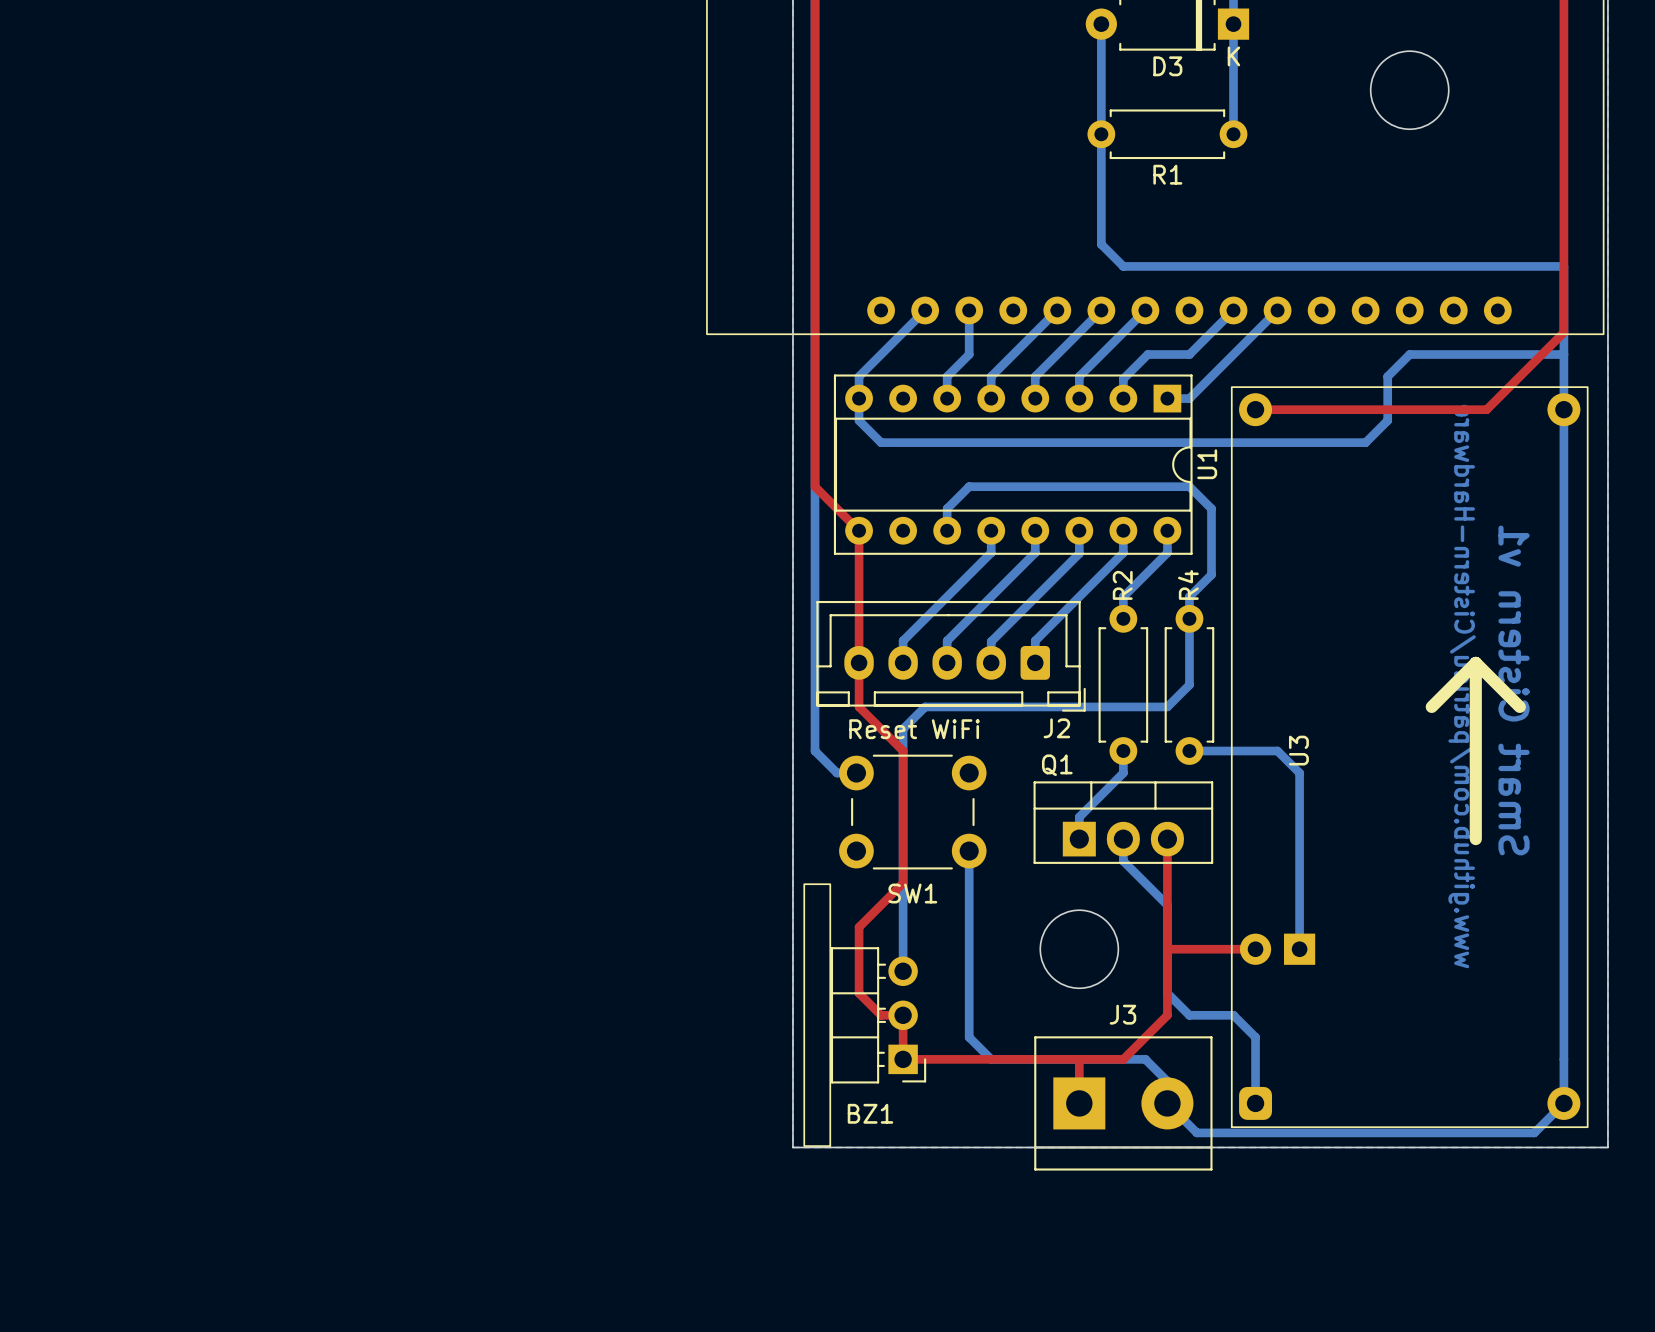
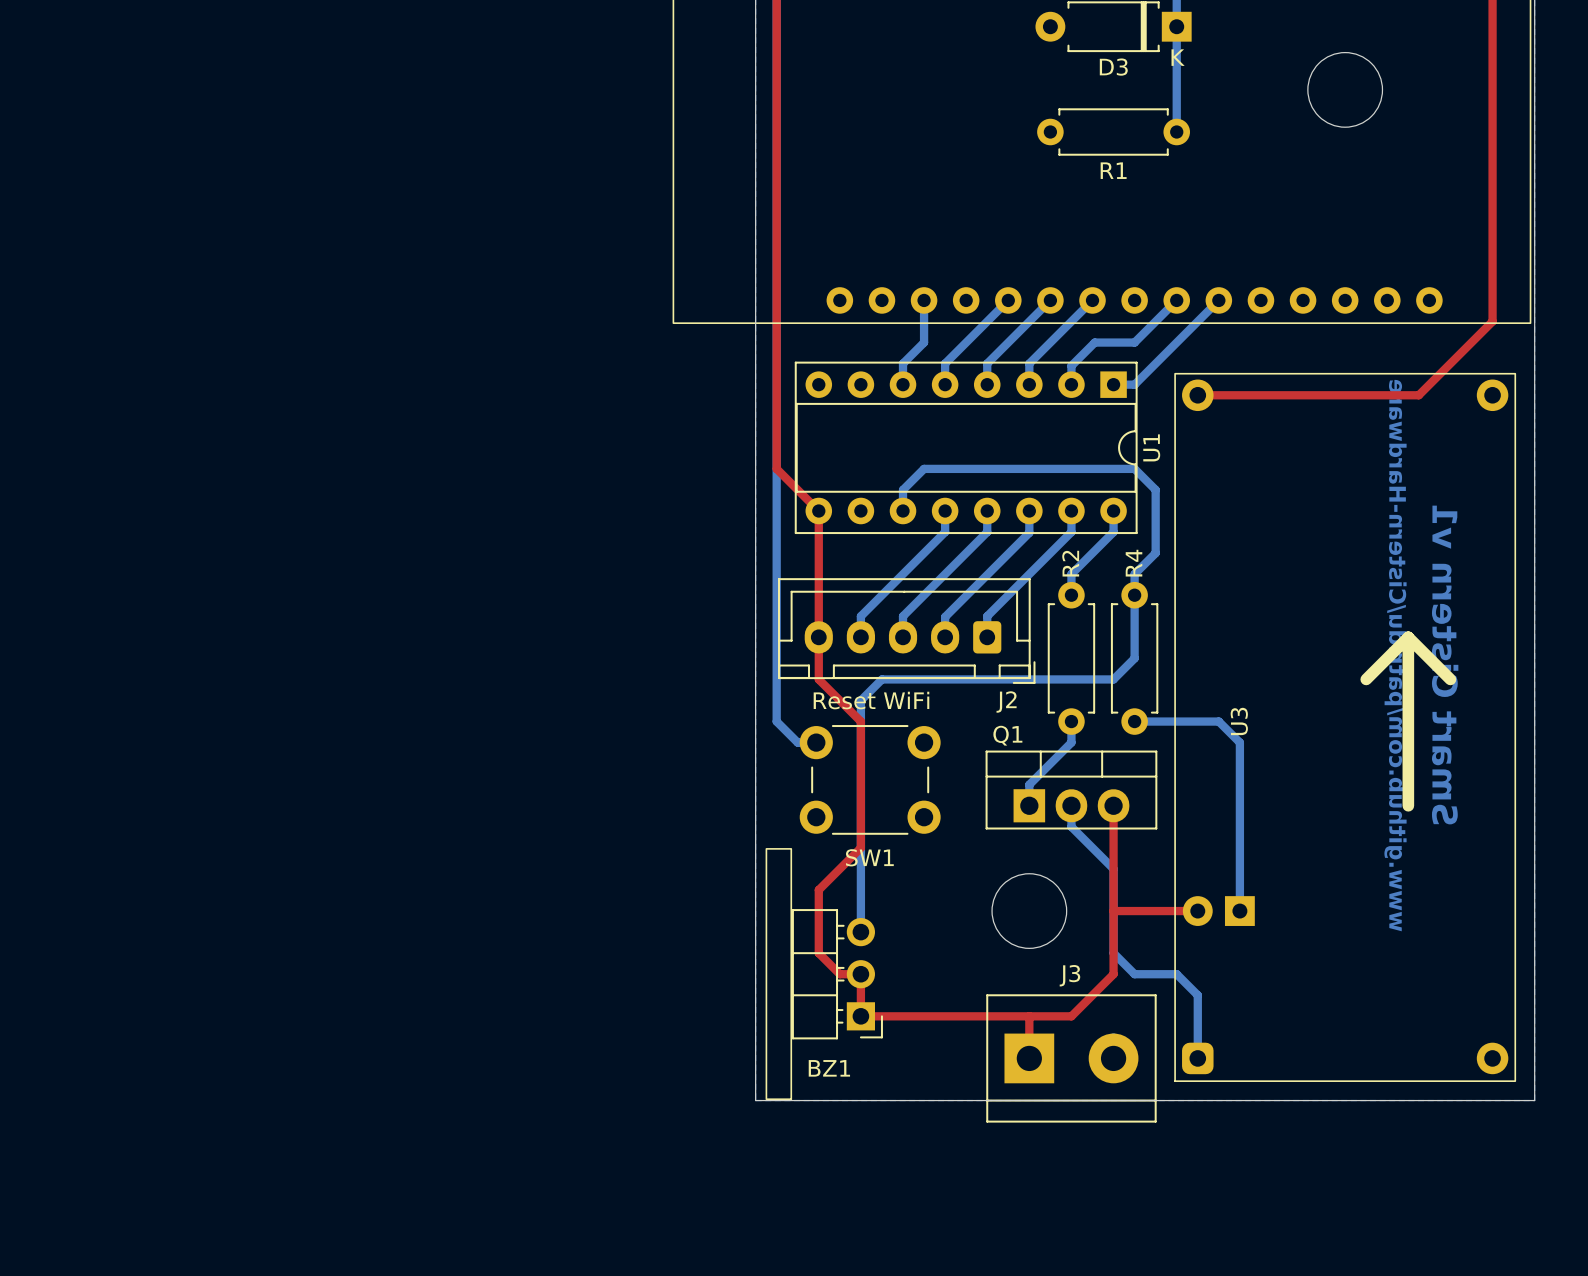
bottom track: (1101, 24) (1101, 244) (1123, 266) (1563, 266) (1563, 1103) (1534, 1132) (1196, 1132) (1167, 1103) -> none
bottom track: (925, 310) (859, 376) (859, 420) (881, 442) (1365, 442) (1387, 420) (1387, 376) (1409, 354) (1563, 354) -> none
bottom track: (969, 851) (969, 1037) (991, 1059) (1145, 1059) (1167, 1081) -> none

